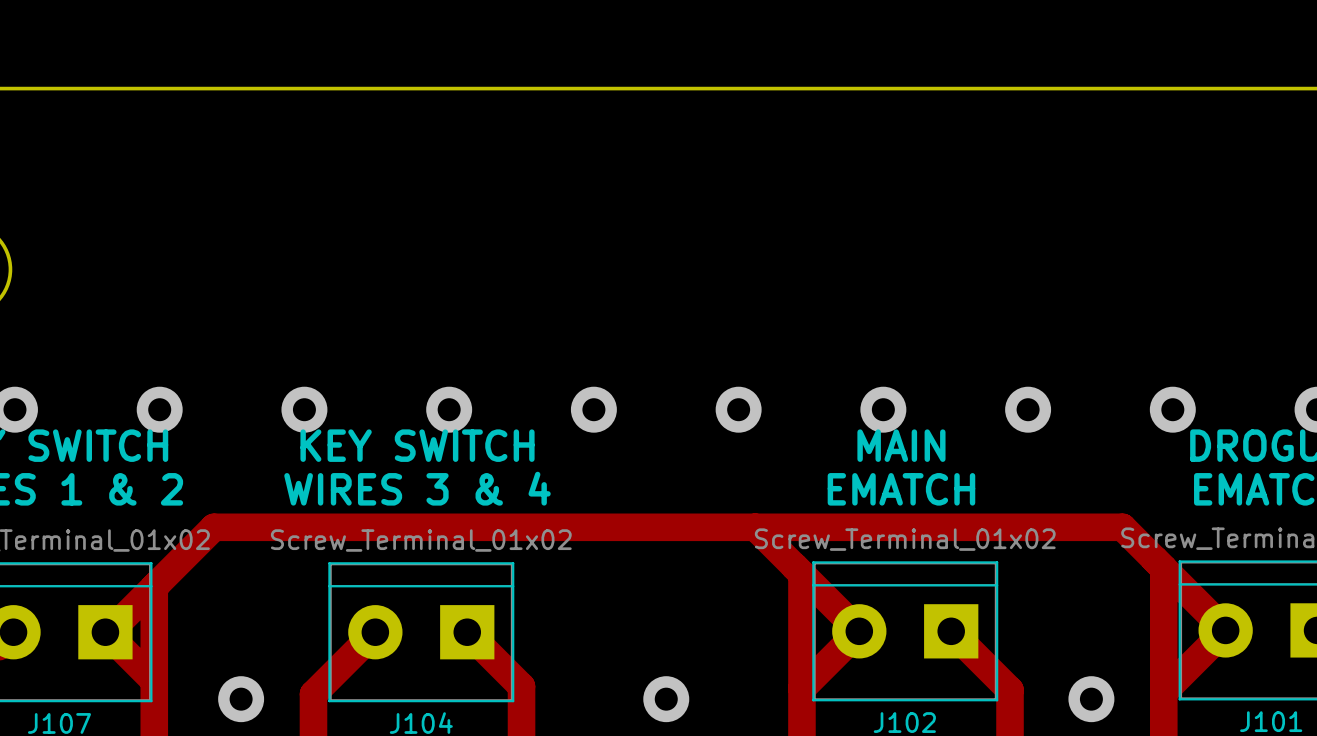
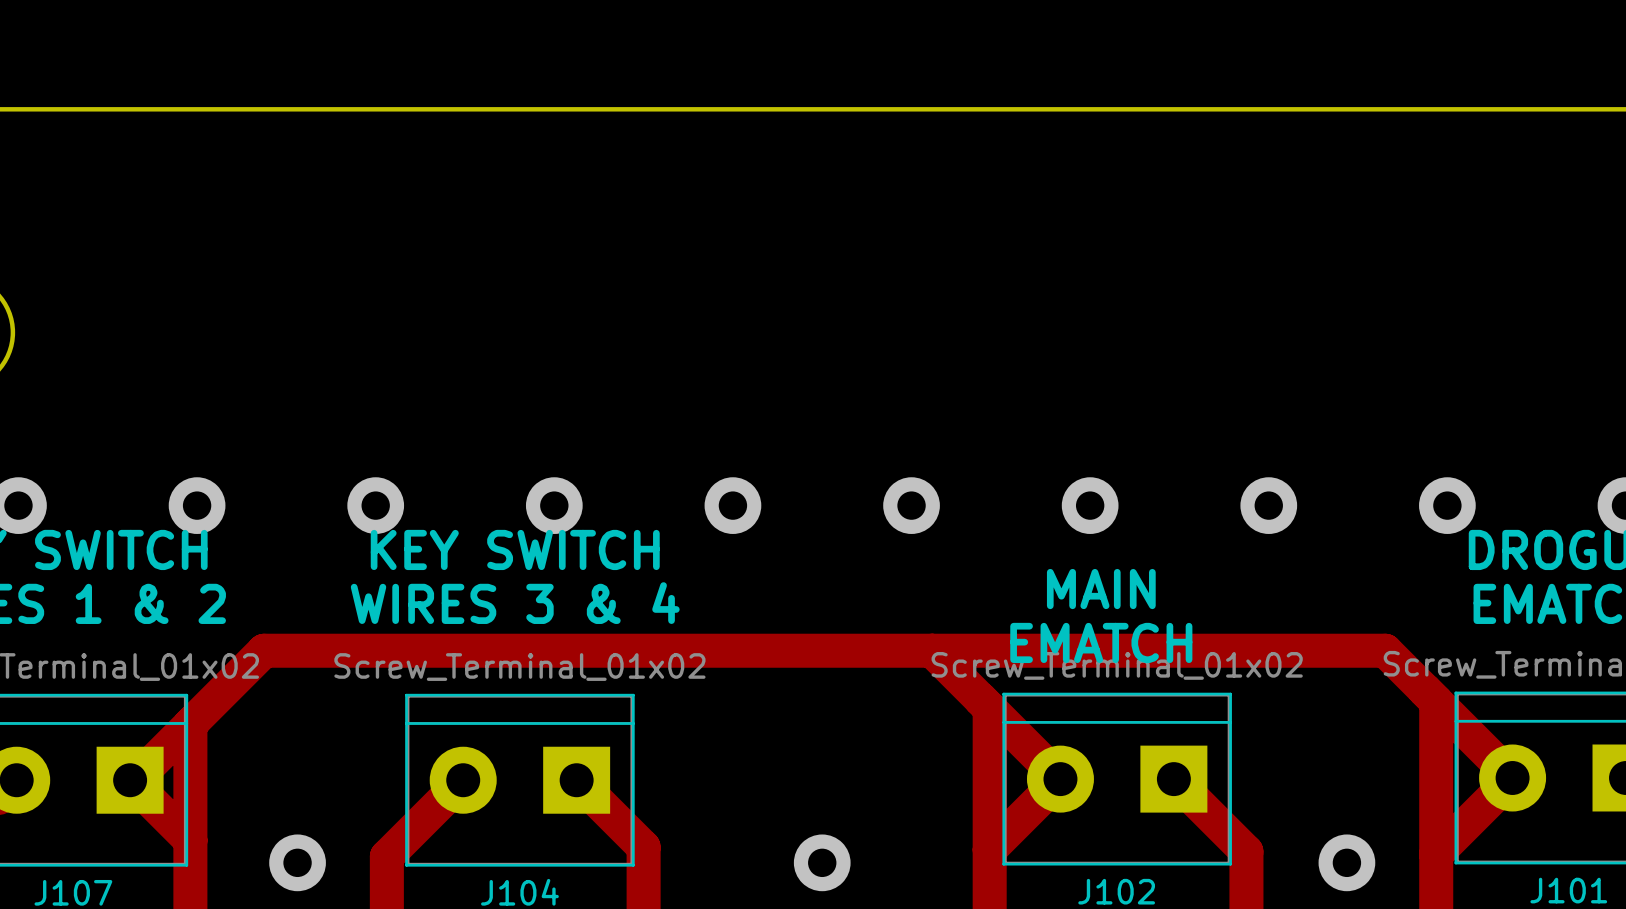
text position: MAIN (901, 445) -> MAIN (1101, 589)
text position: EMATCH (901, 489) -> EMATCH (1101, 642)

